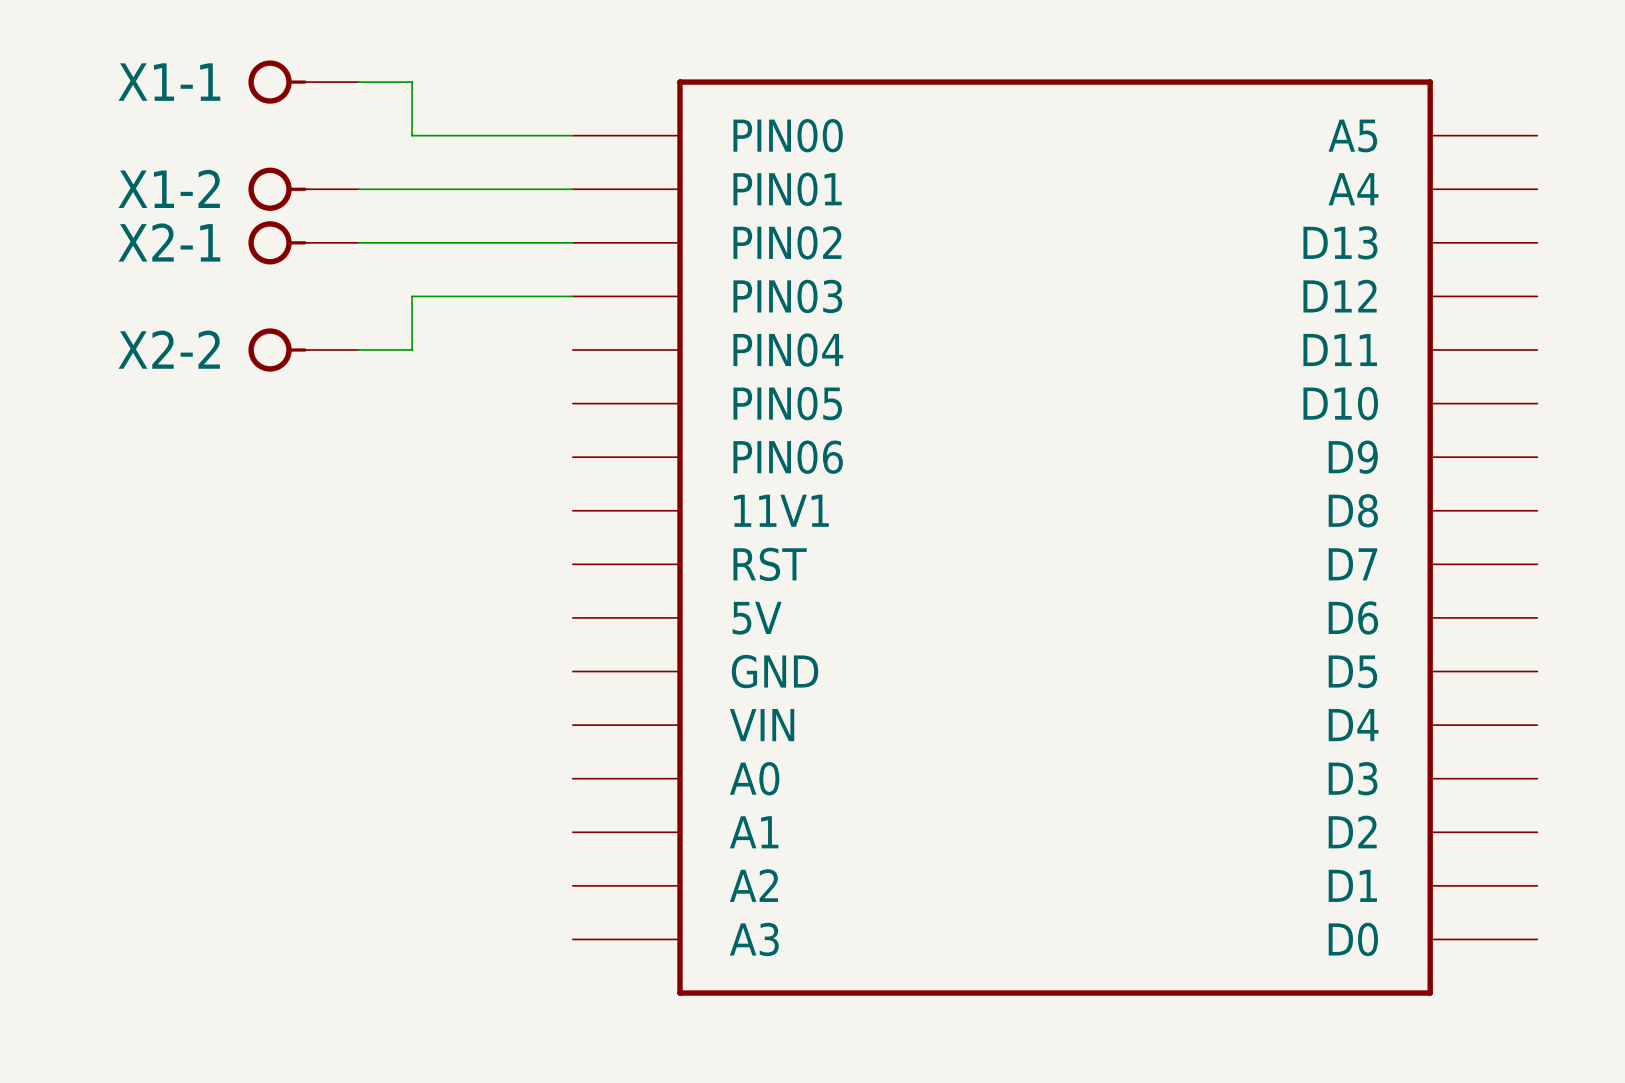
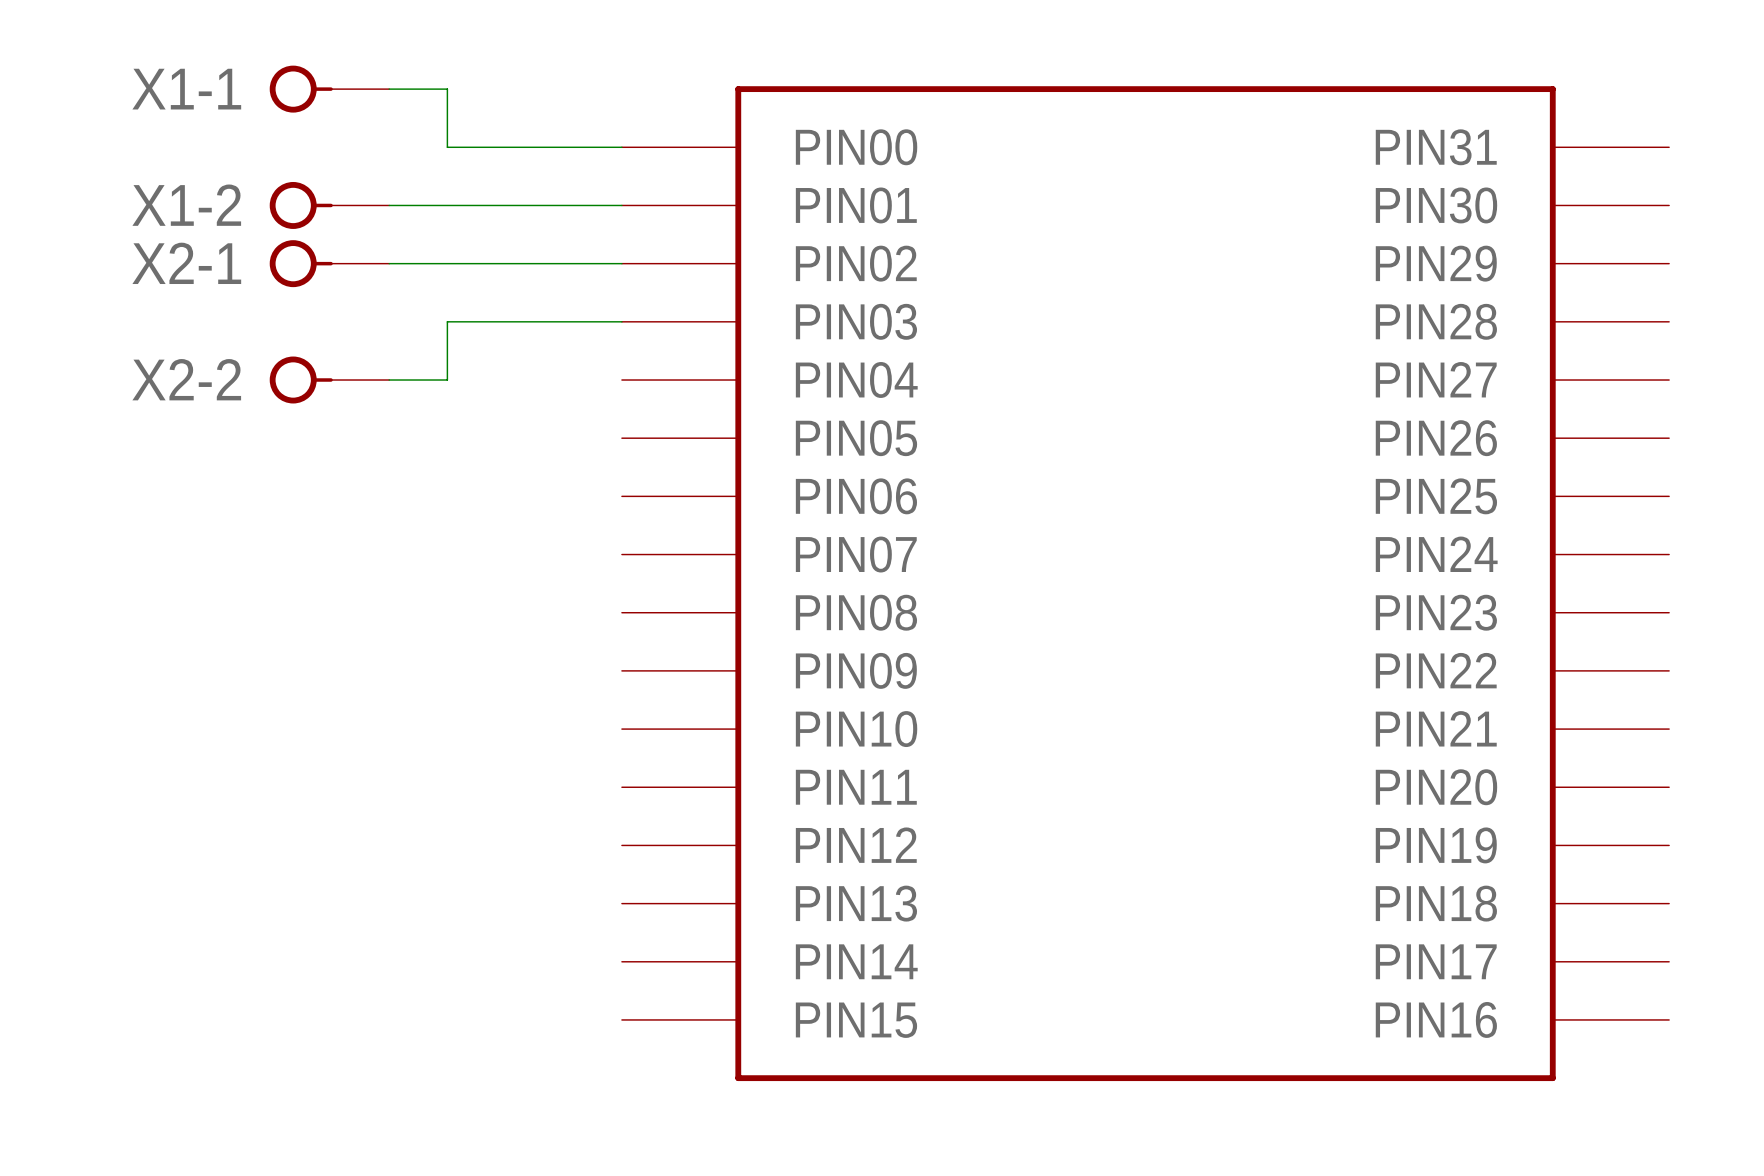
part symbol: [572, 79, 1538, 996] -> [621, 86, 1670, 1082]

